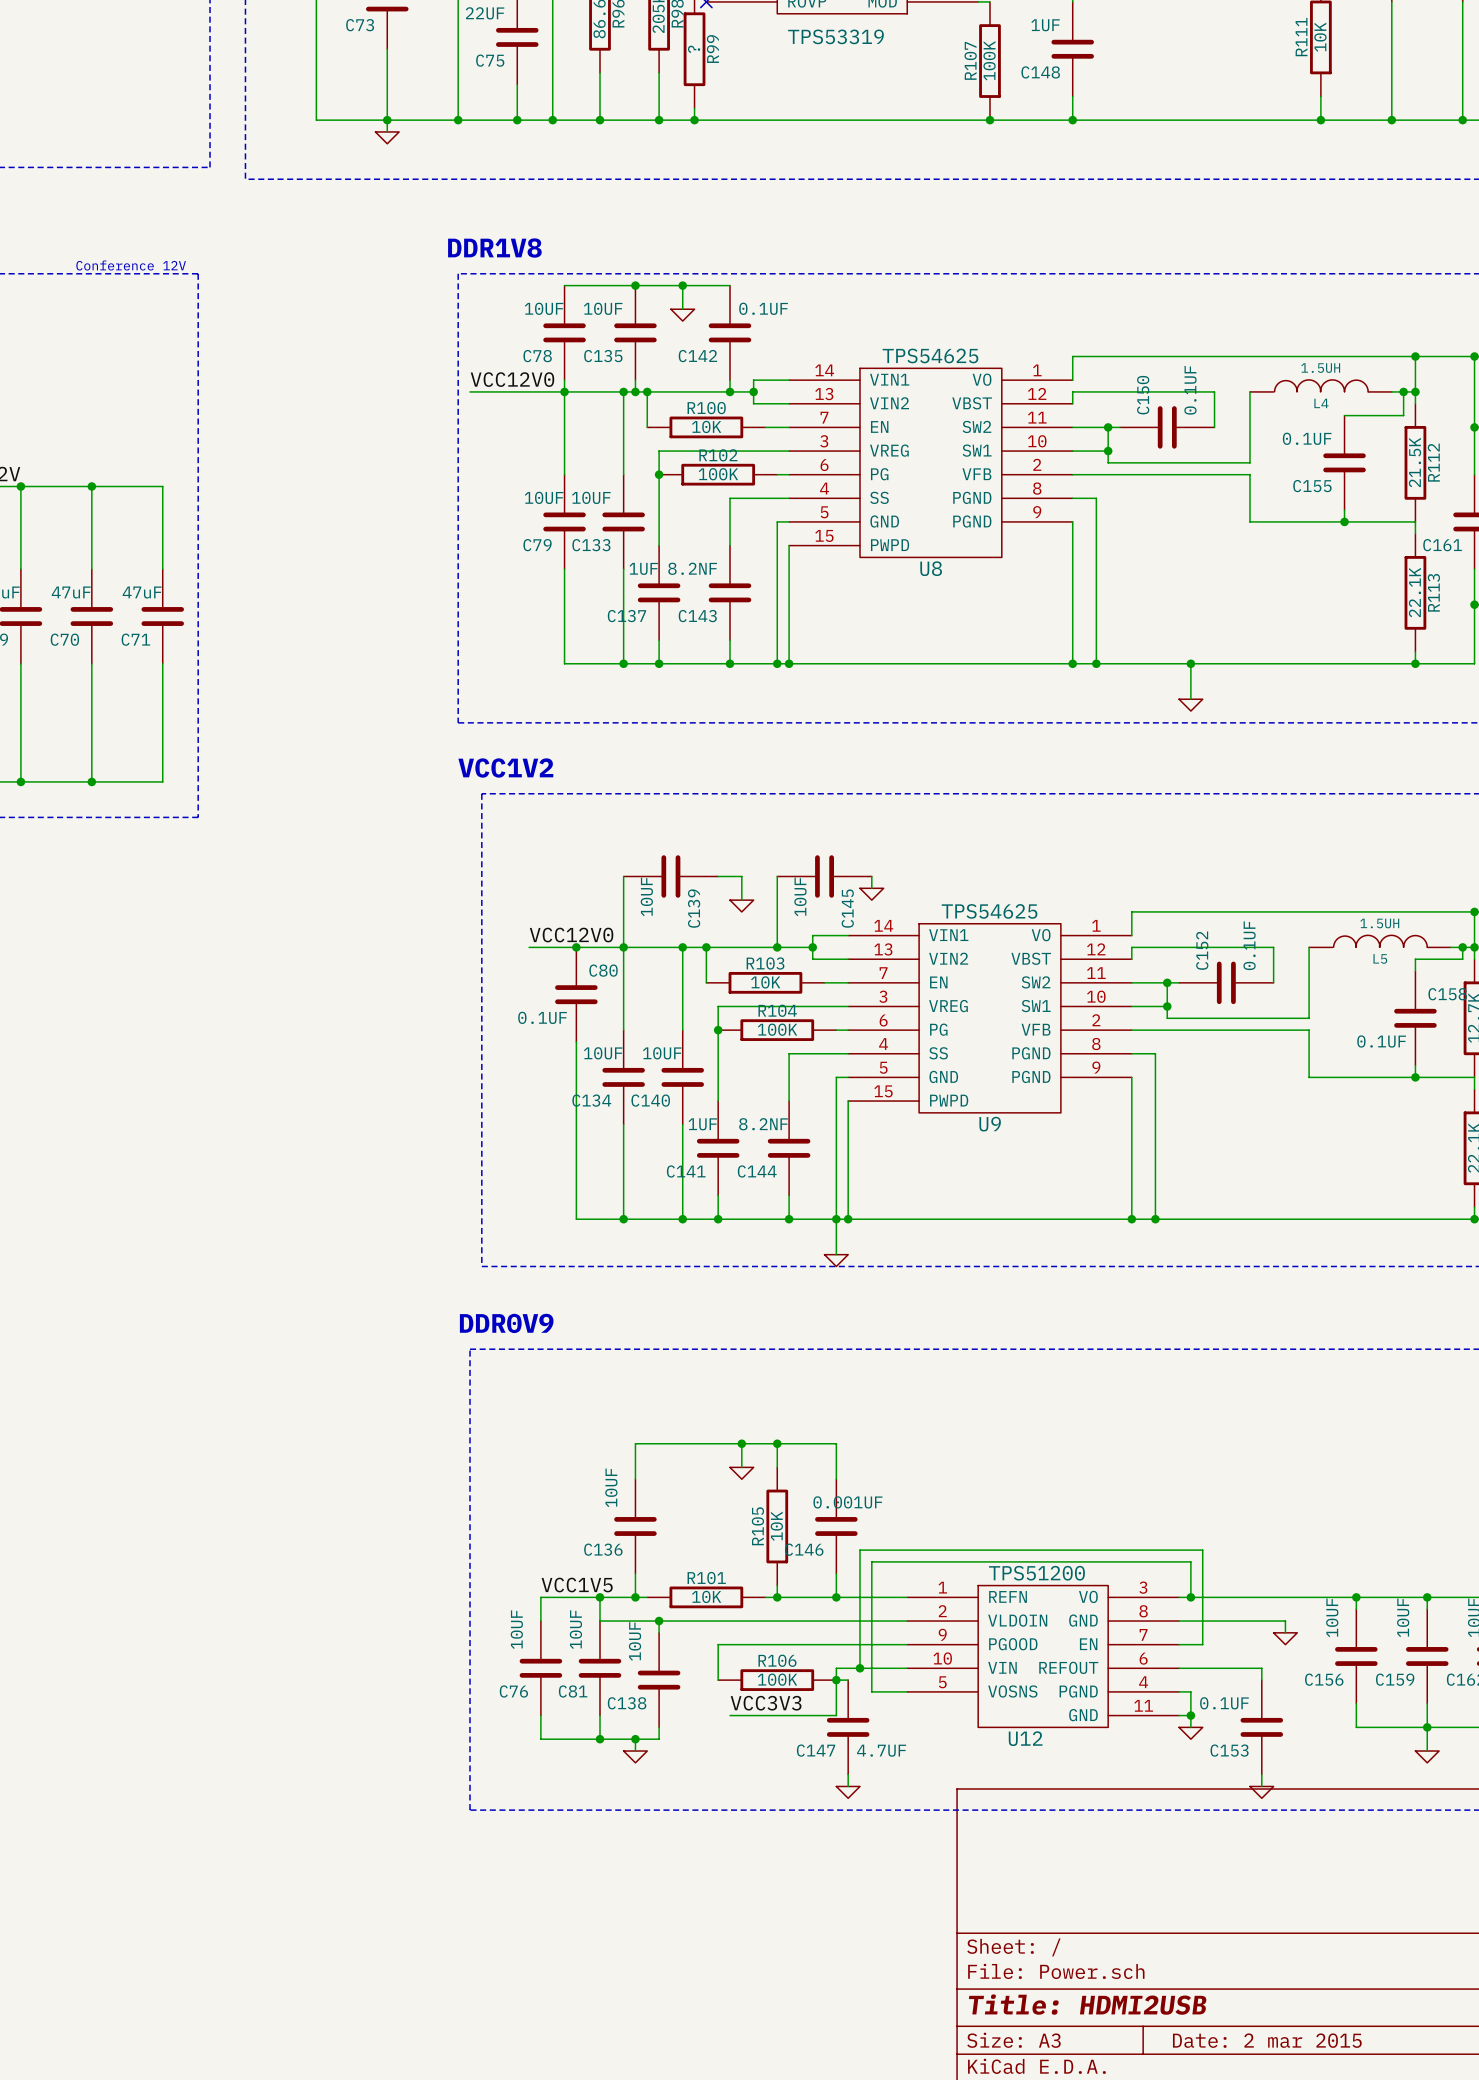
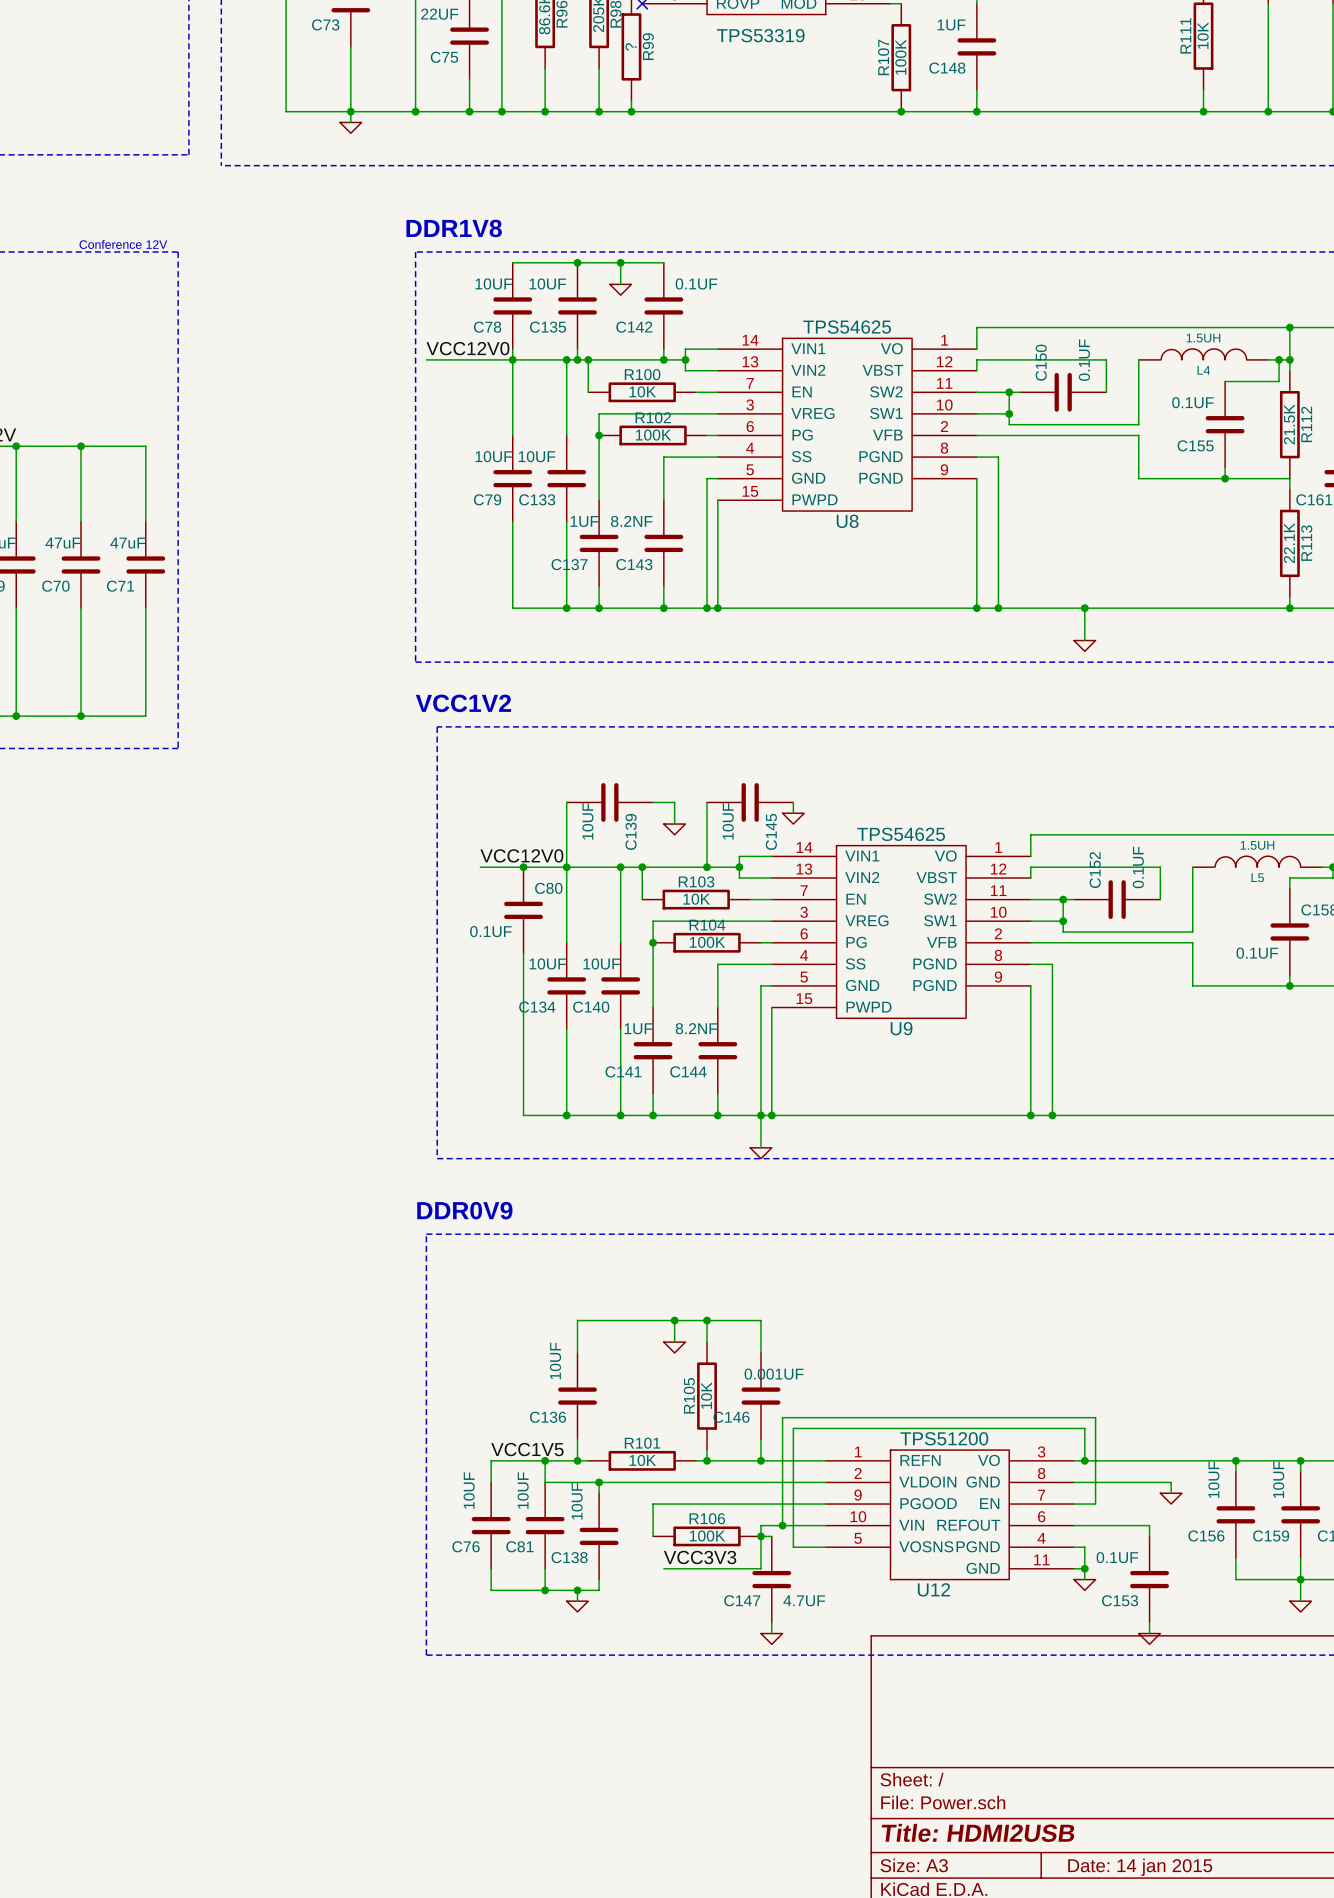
title block: Date: 2 mar 2015 (1267, 2040) -> Date: 14 jan 2015 (1140, 1867)

